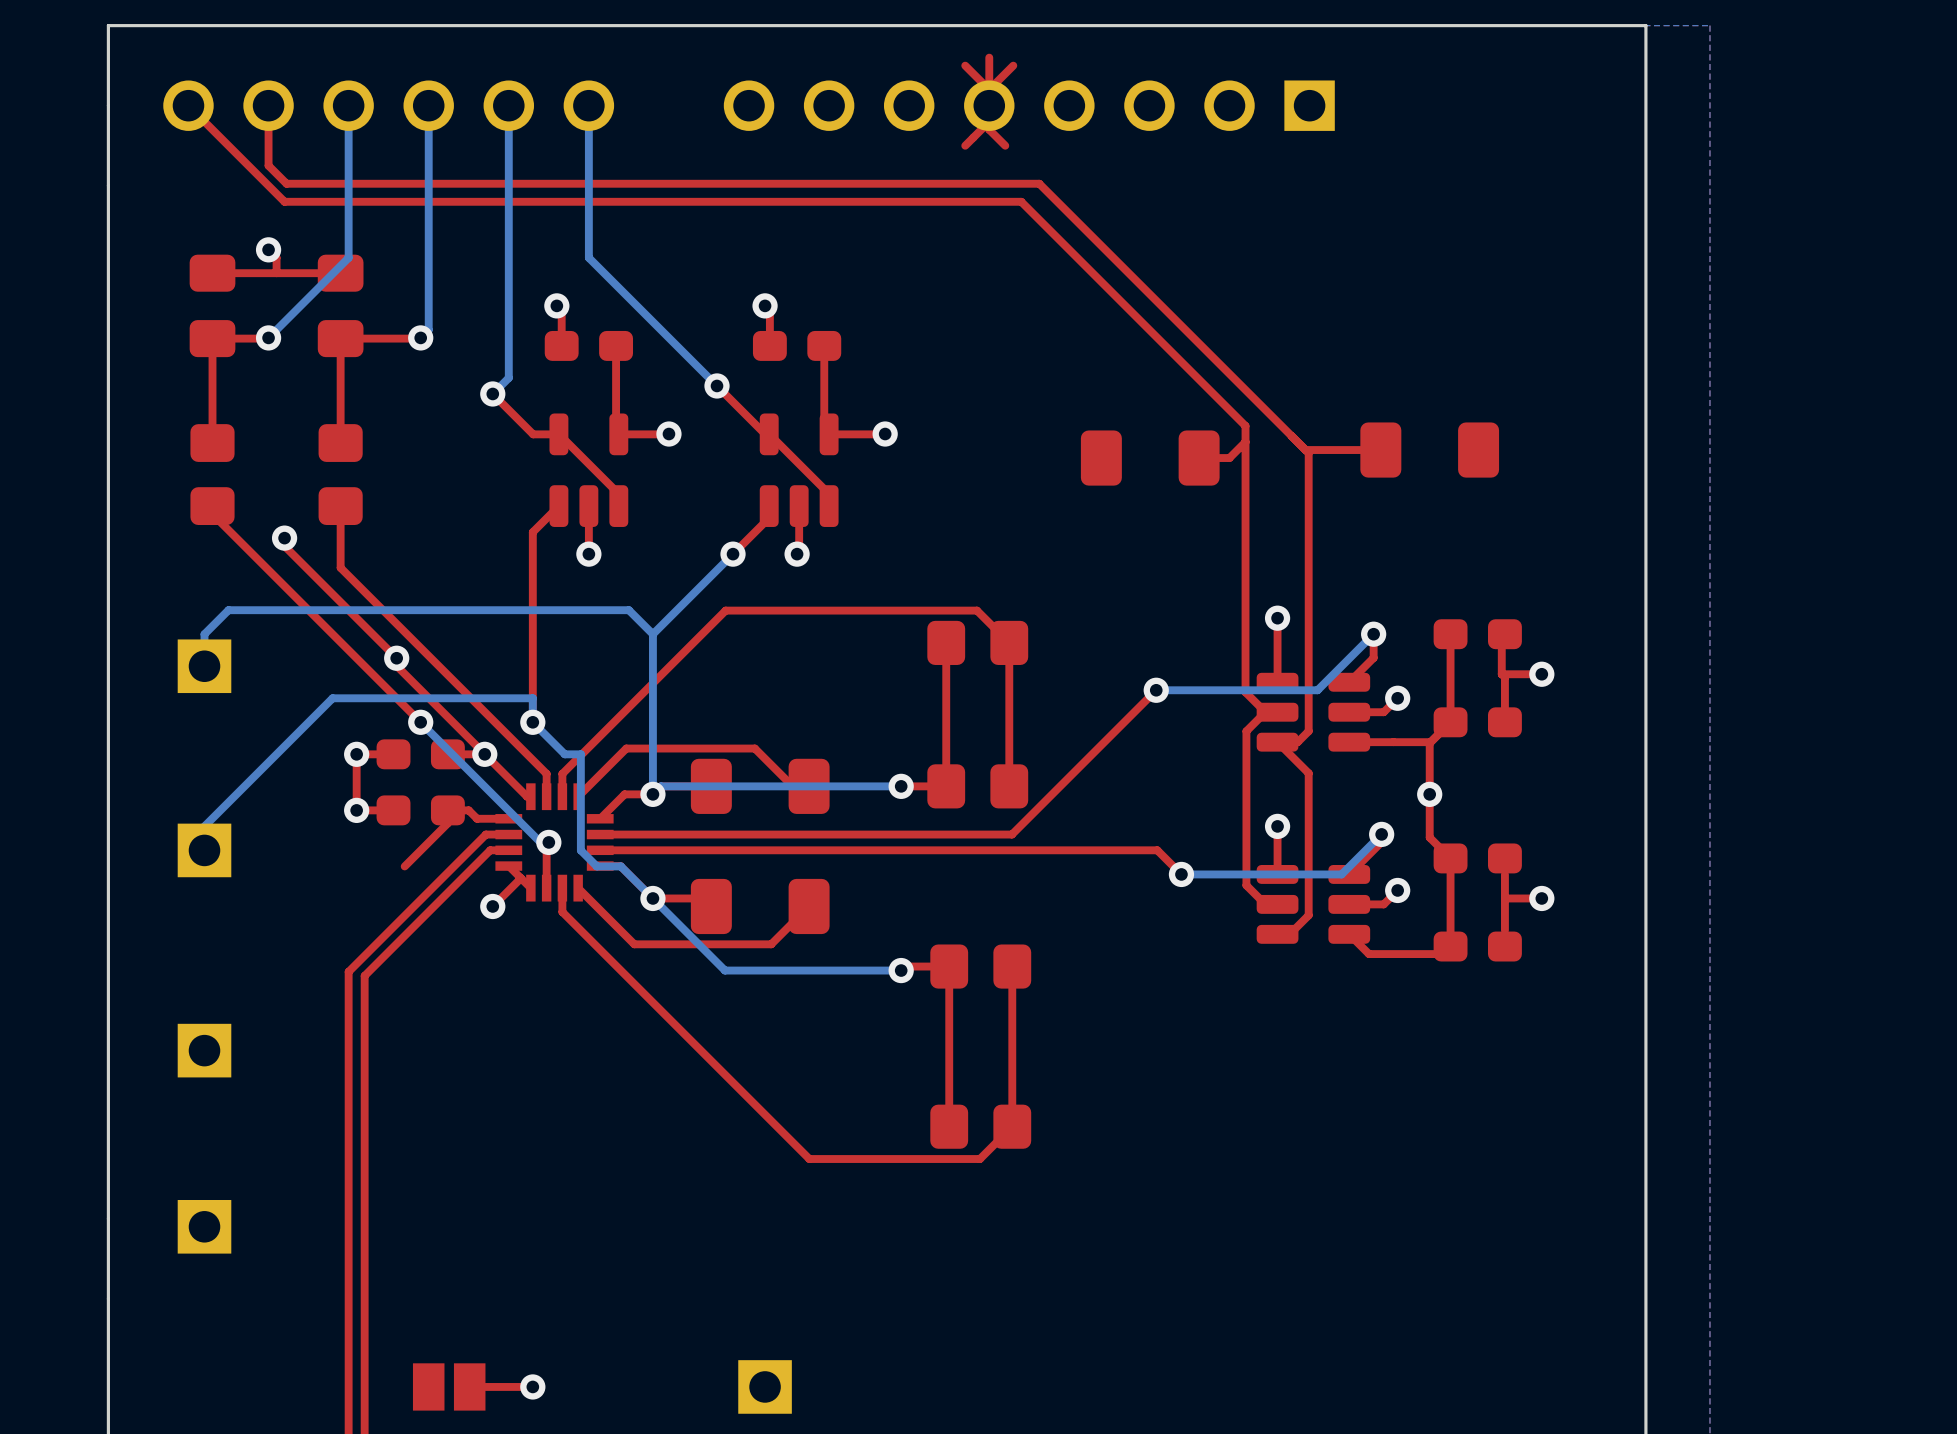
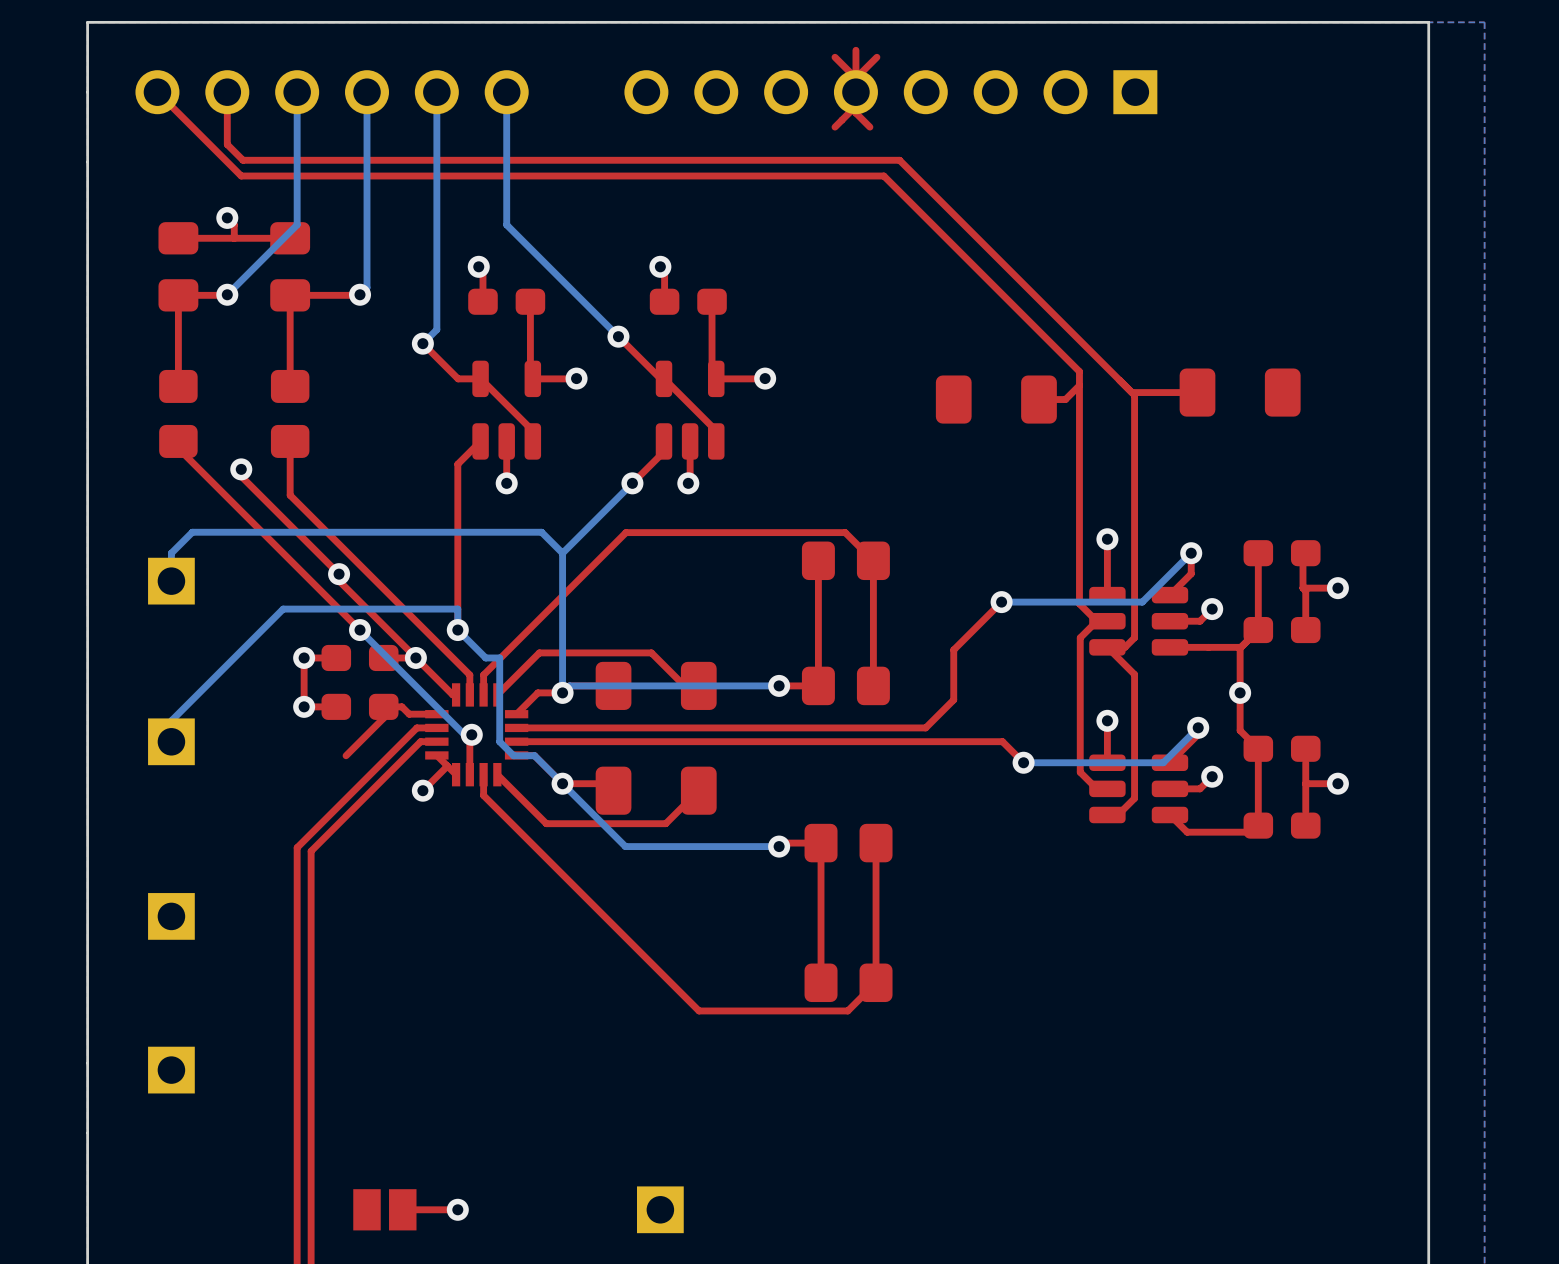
top track: (1101, 745) (1011, 834) -> (953, 649) (953, 699) (925, 727) (875, 727)

